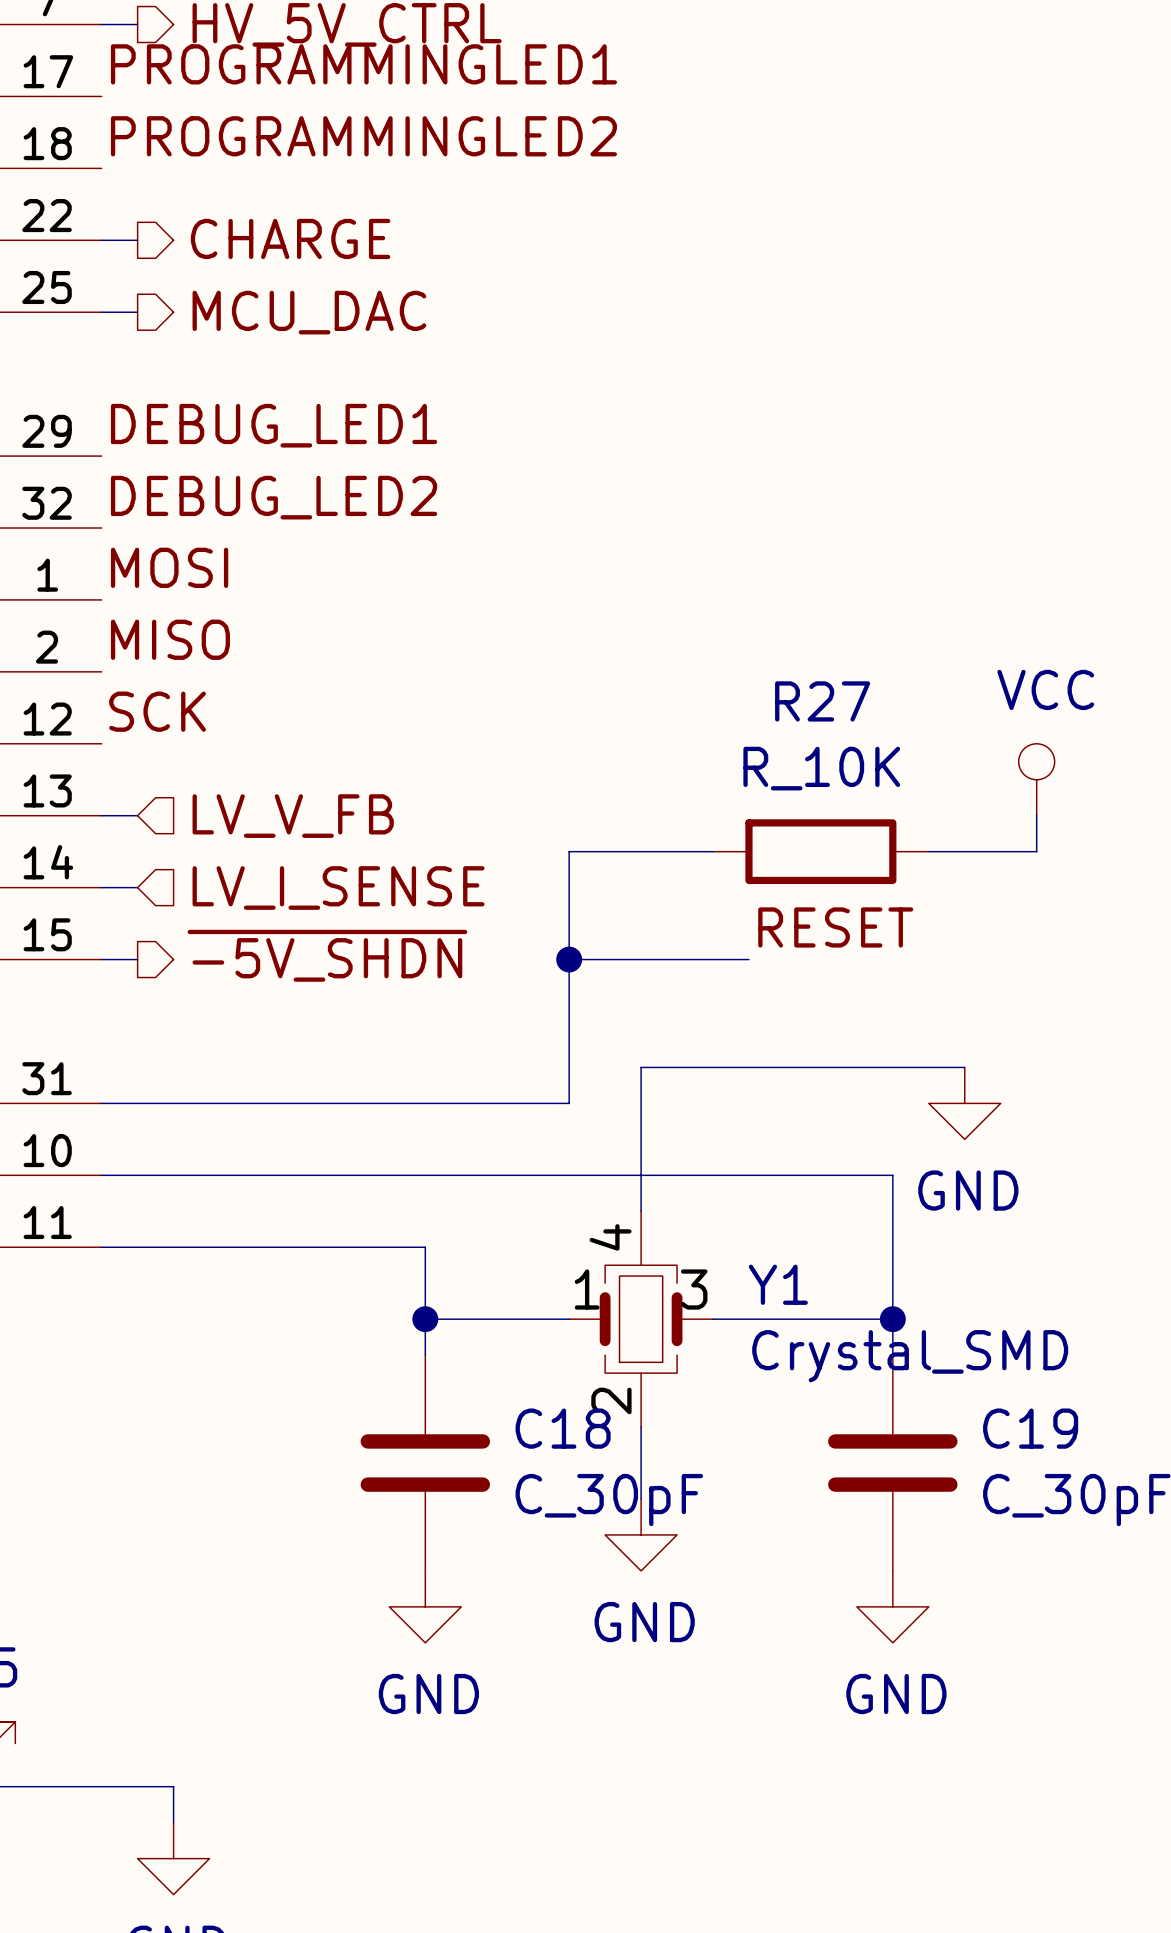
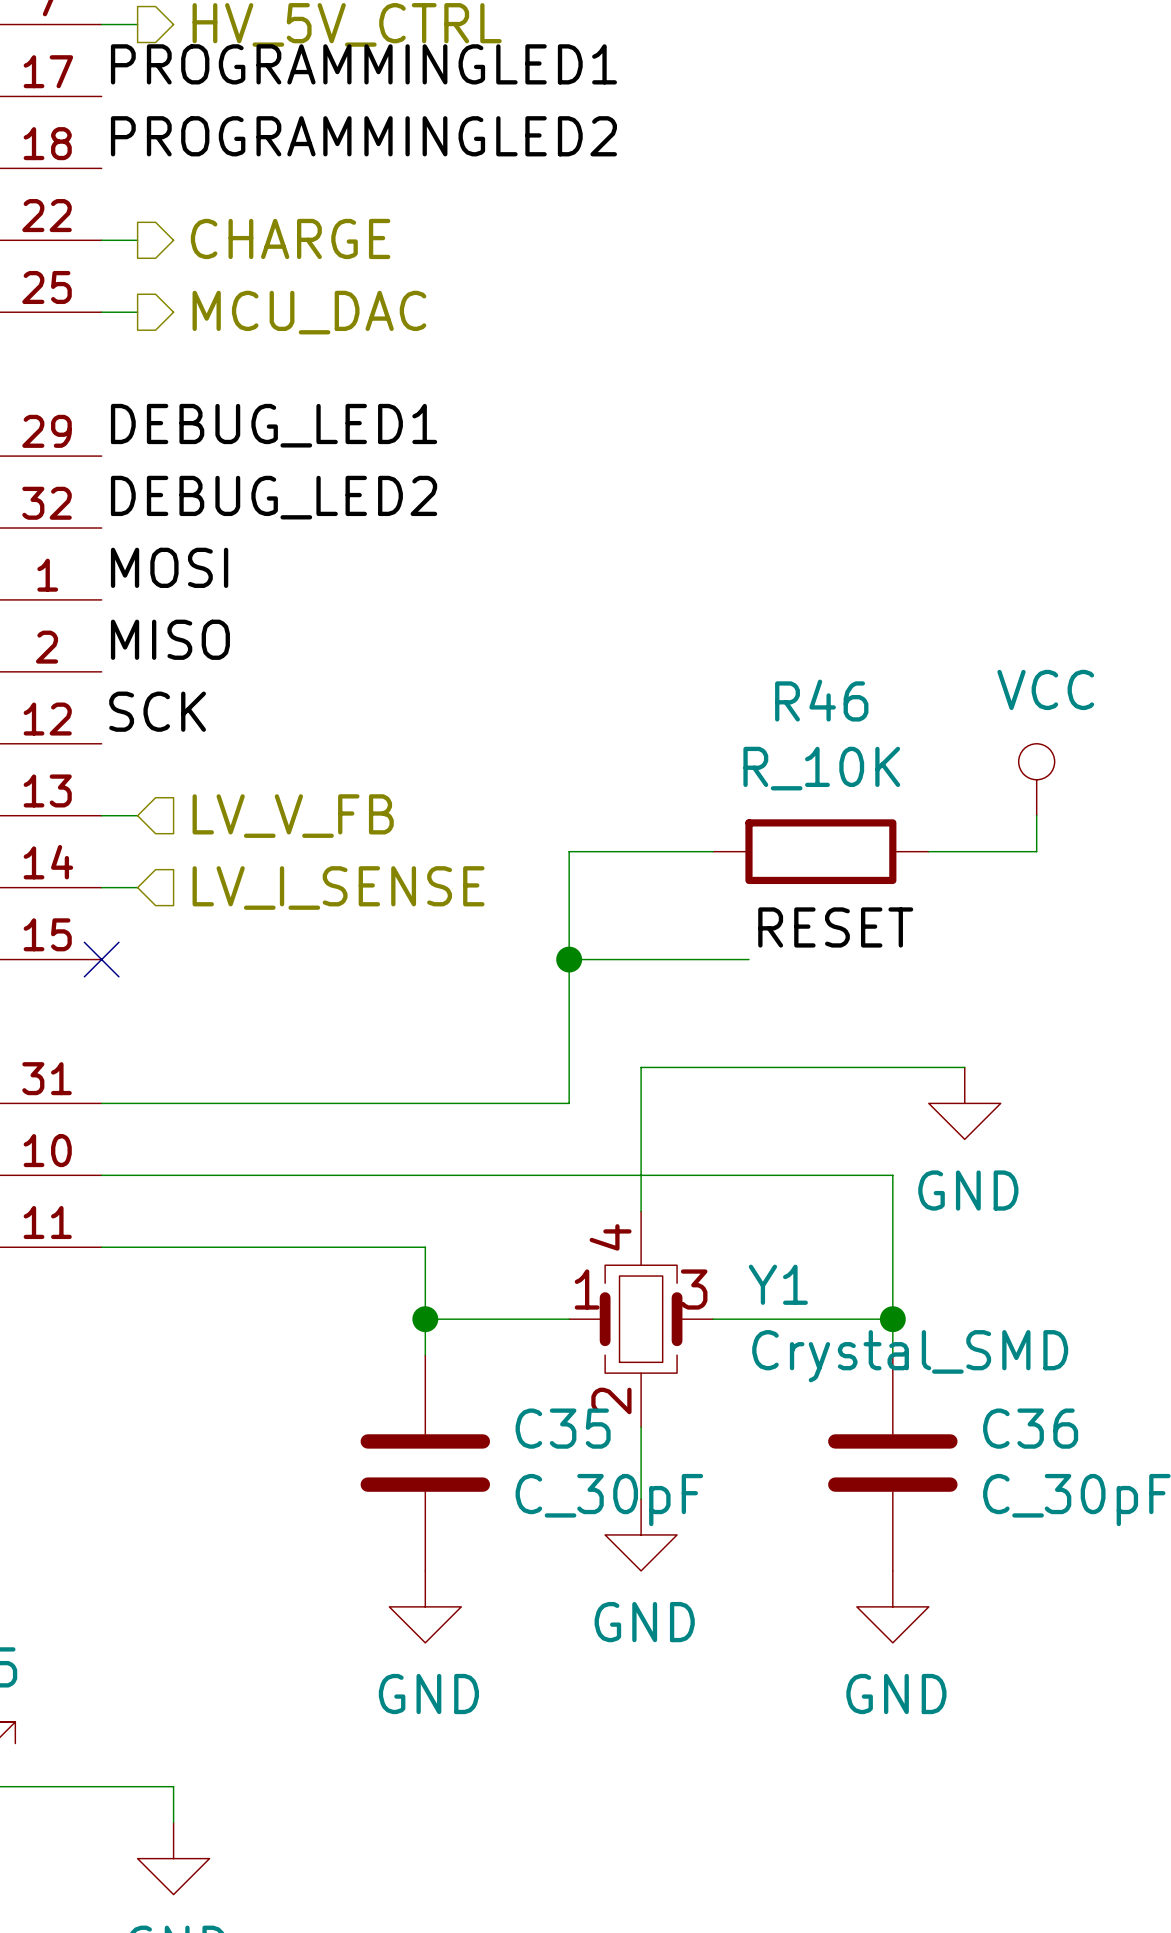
R27 name: R27 (822, 701) -> R46 (821, 700)
hierarchical label: ~{-5V_SHDN} (327, 955) -> none
wire: (101, 959) (137, 959) -> none
no-connect mark: none -> (101, 959)
C18 name: C18 (563, 1428) -> C35 (563, 1428)
C19 name: C19 (1030, 1428) -> C36 (1030, 1428)

